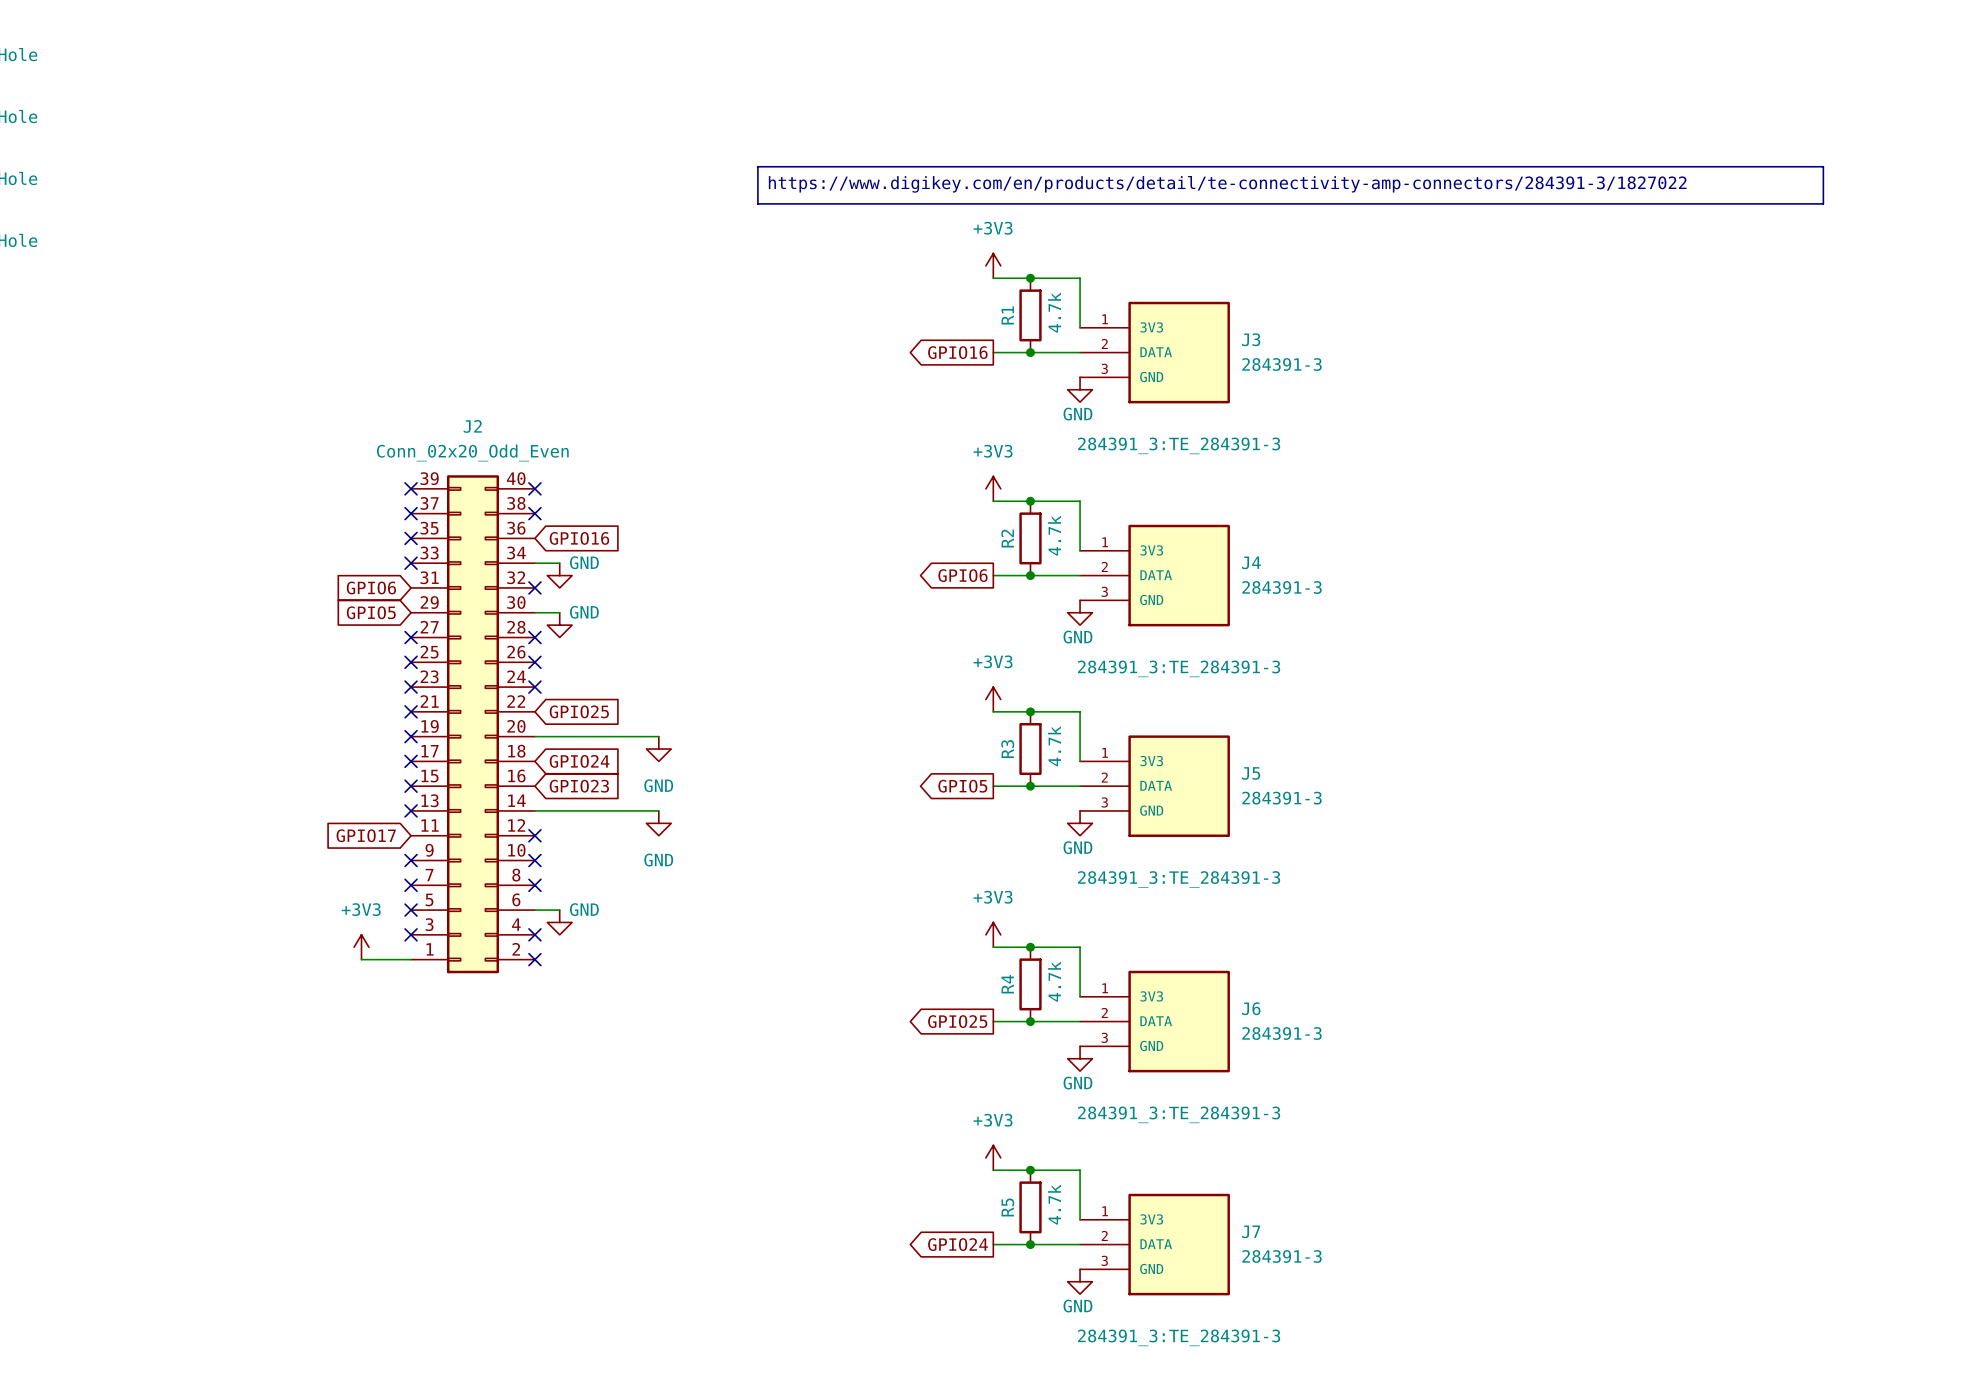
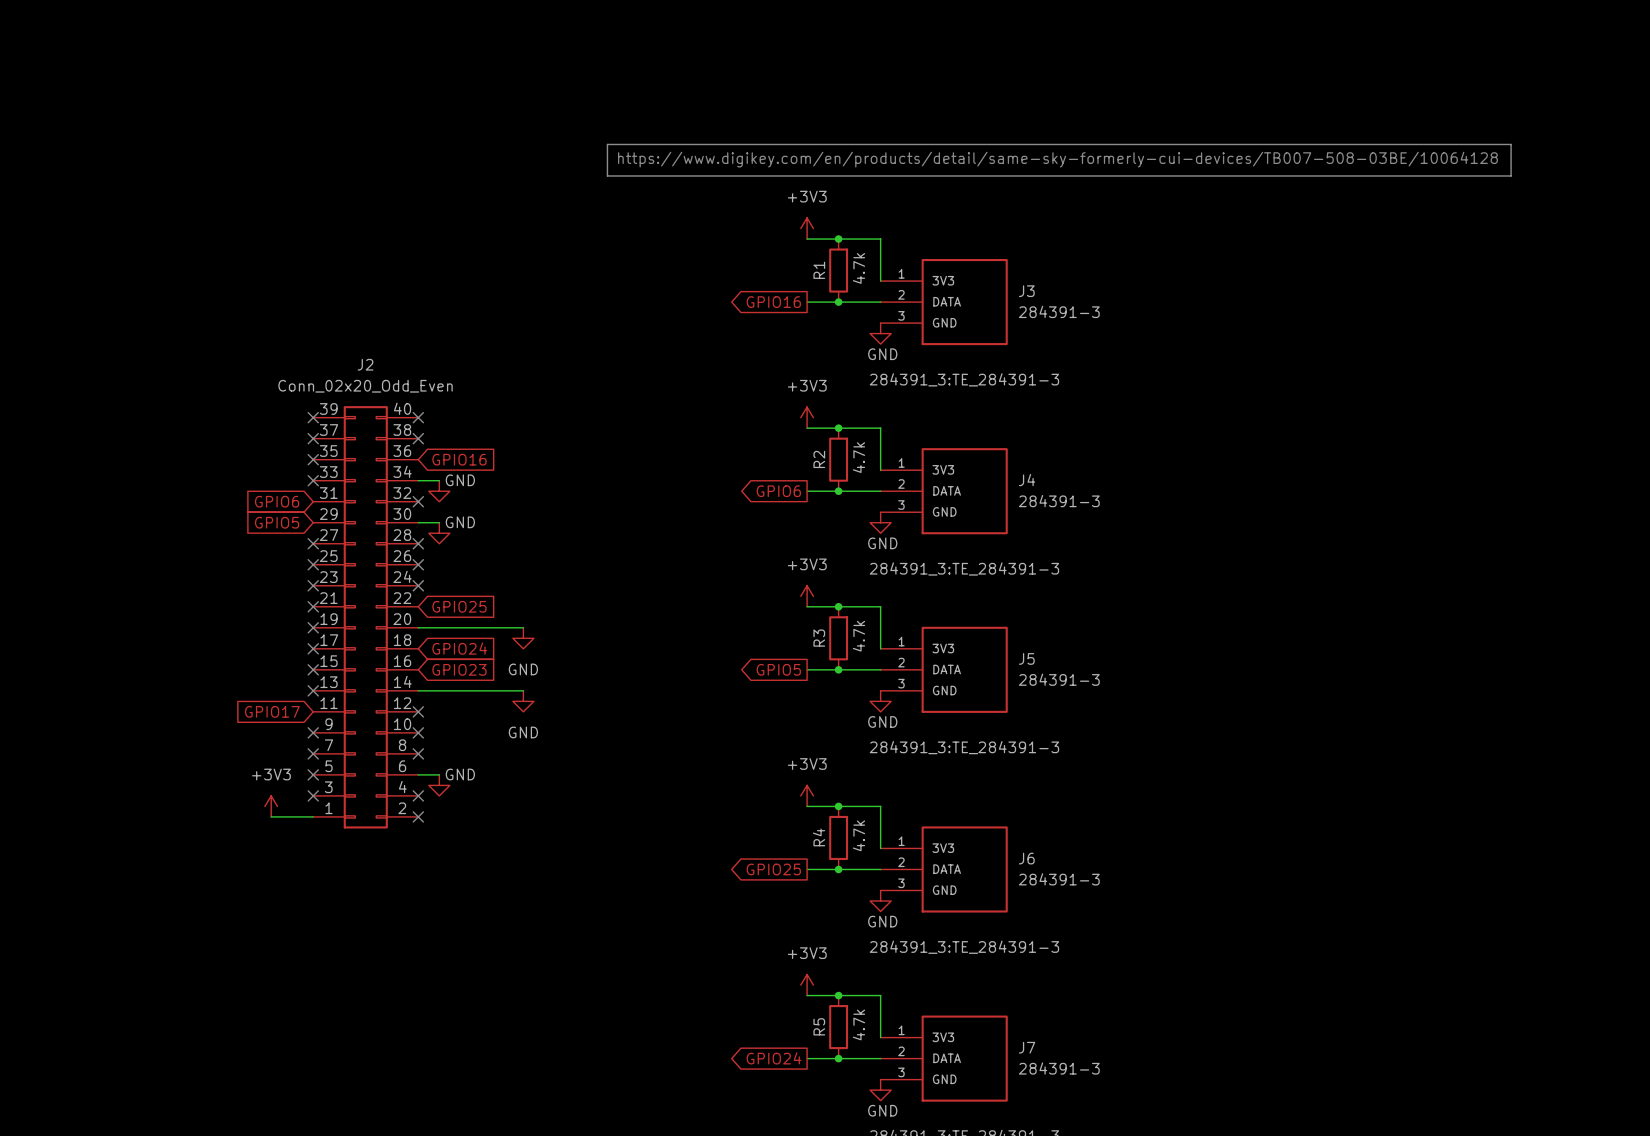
text: https://www.digikey.com/en/products/detail/te-connectivity-amp-connectors/284391-3/1827022 (1227, 184) -> https://www.digikey.com/en/products/detail/same-sky-formerly-cui-devices/TB007-508-03BE/10064128 (1057, 159)

